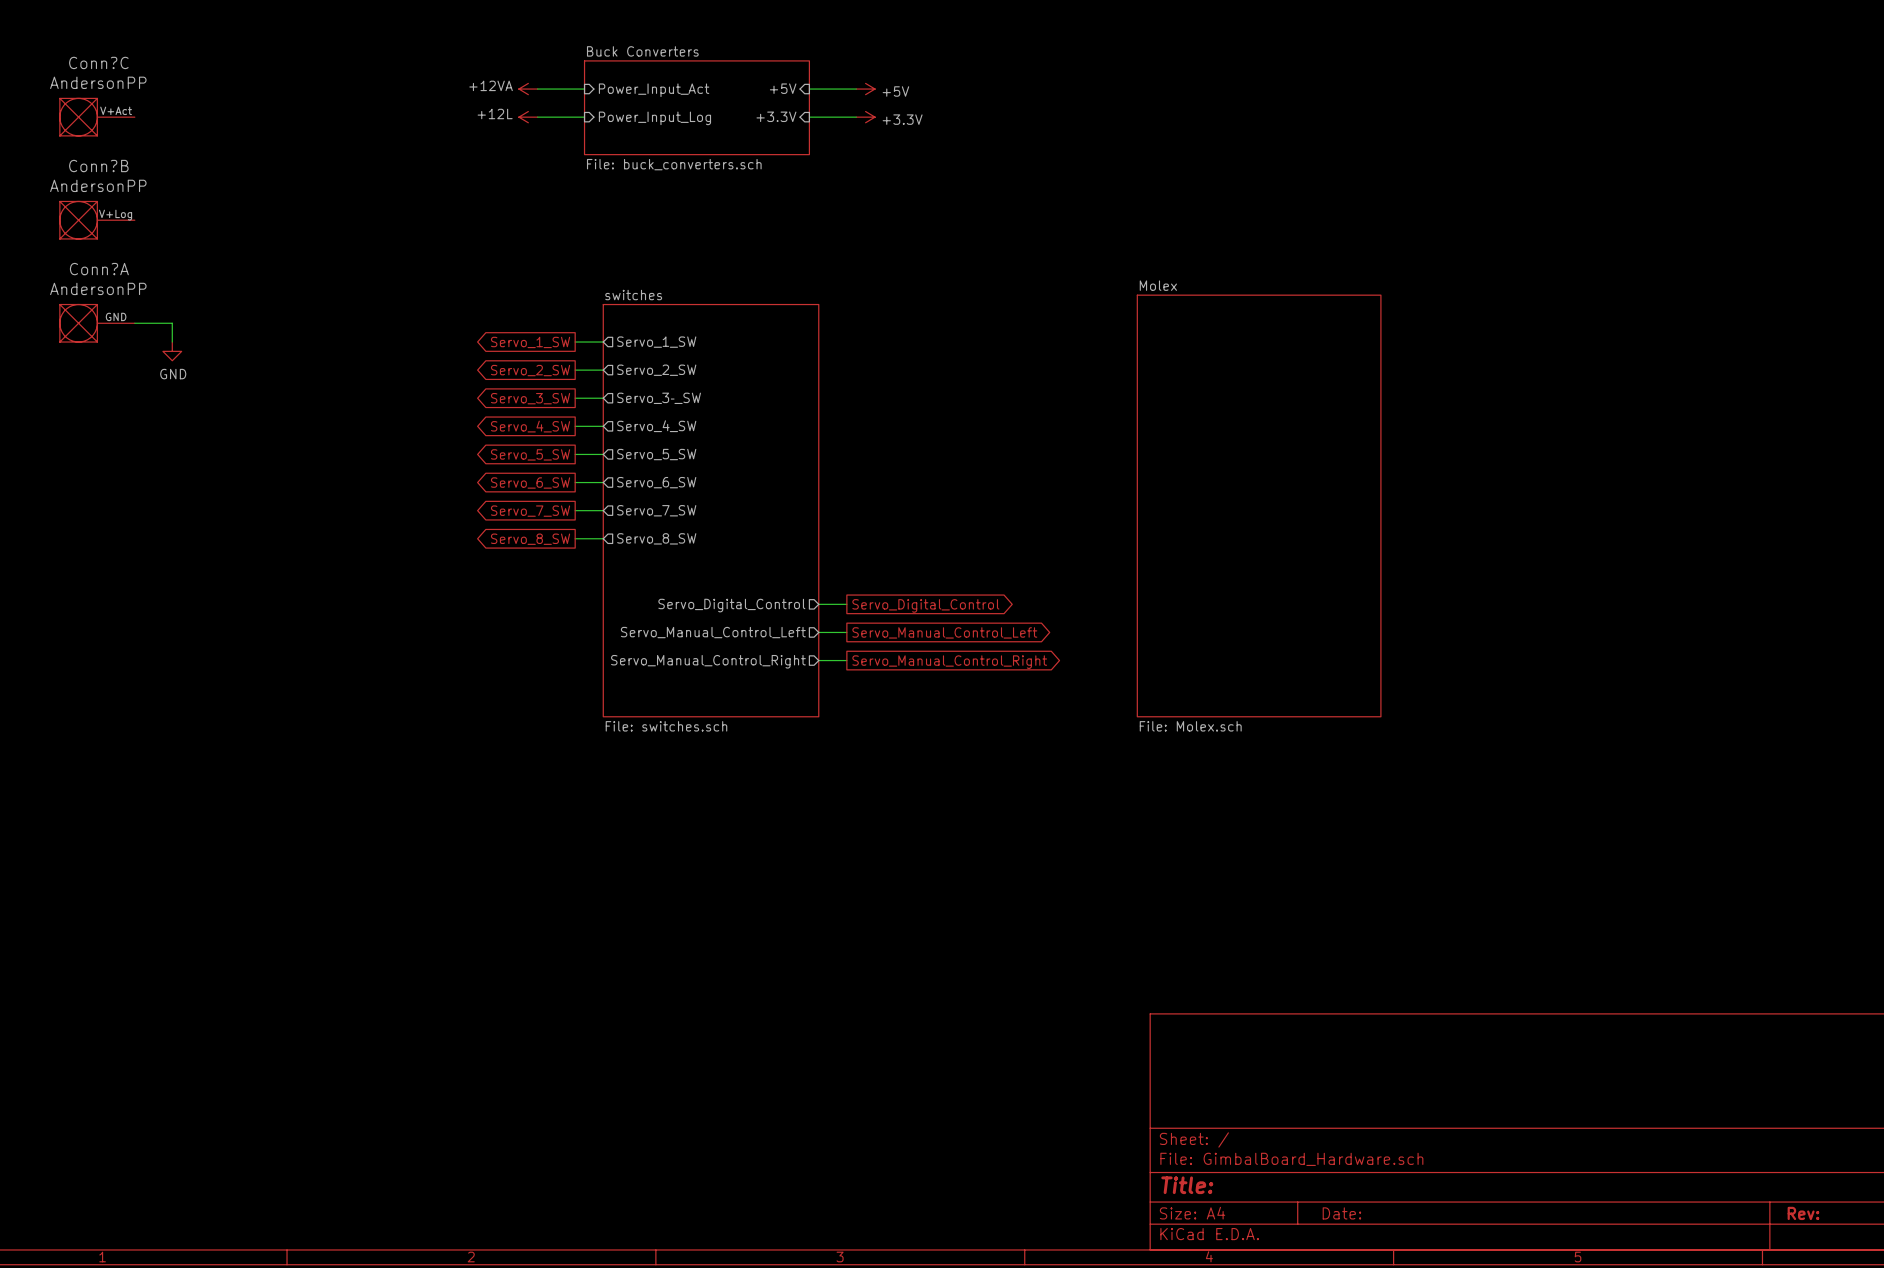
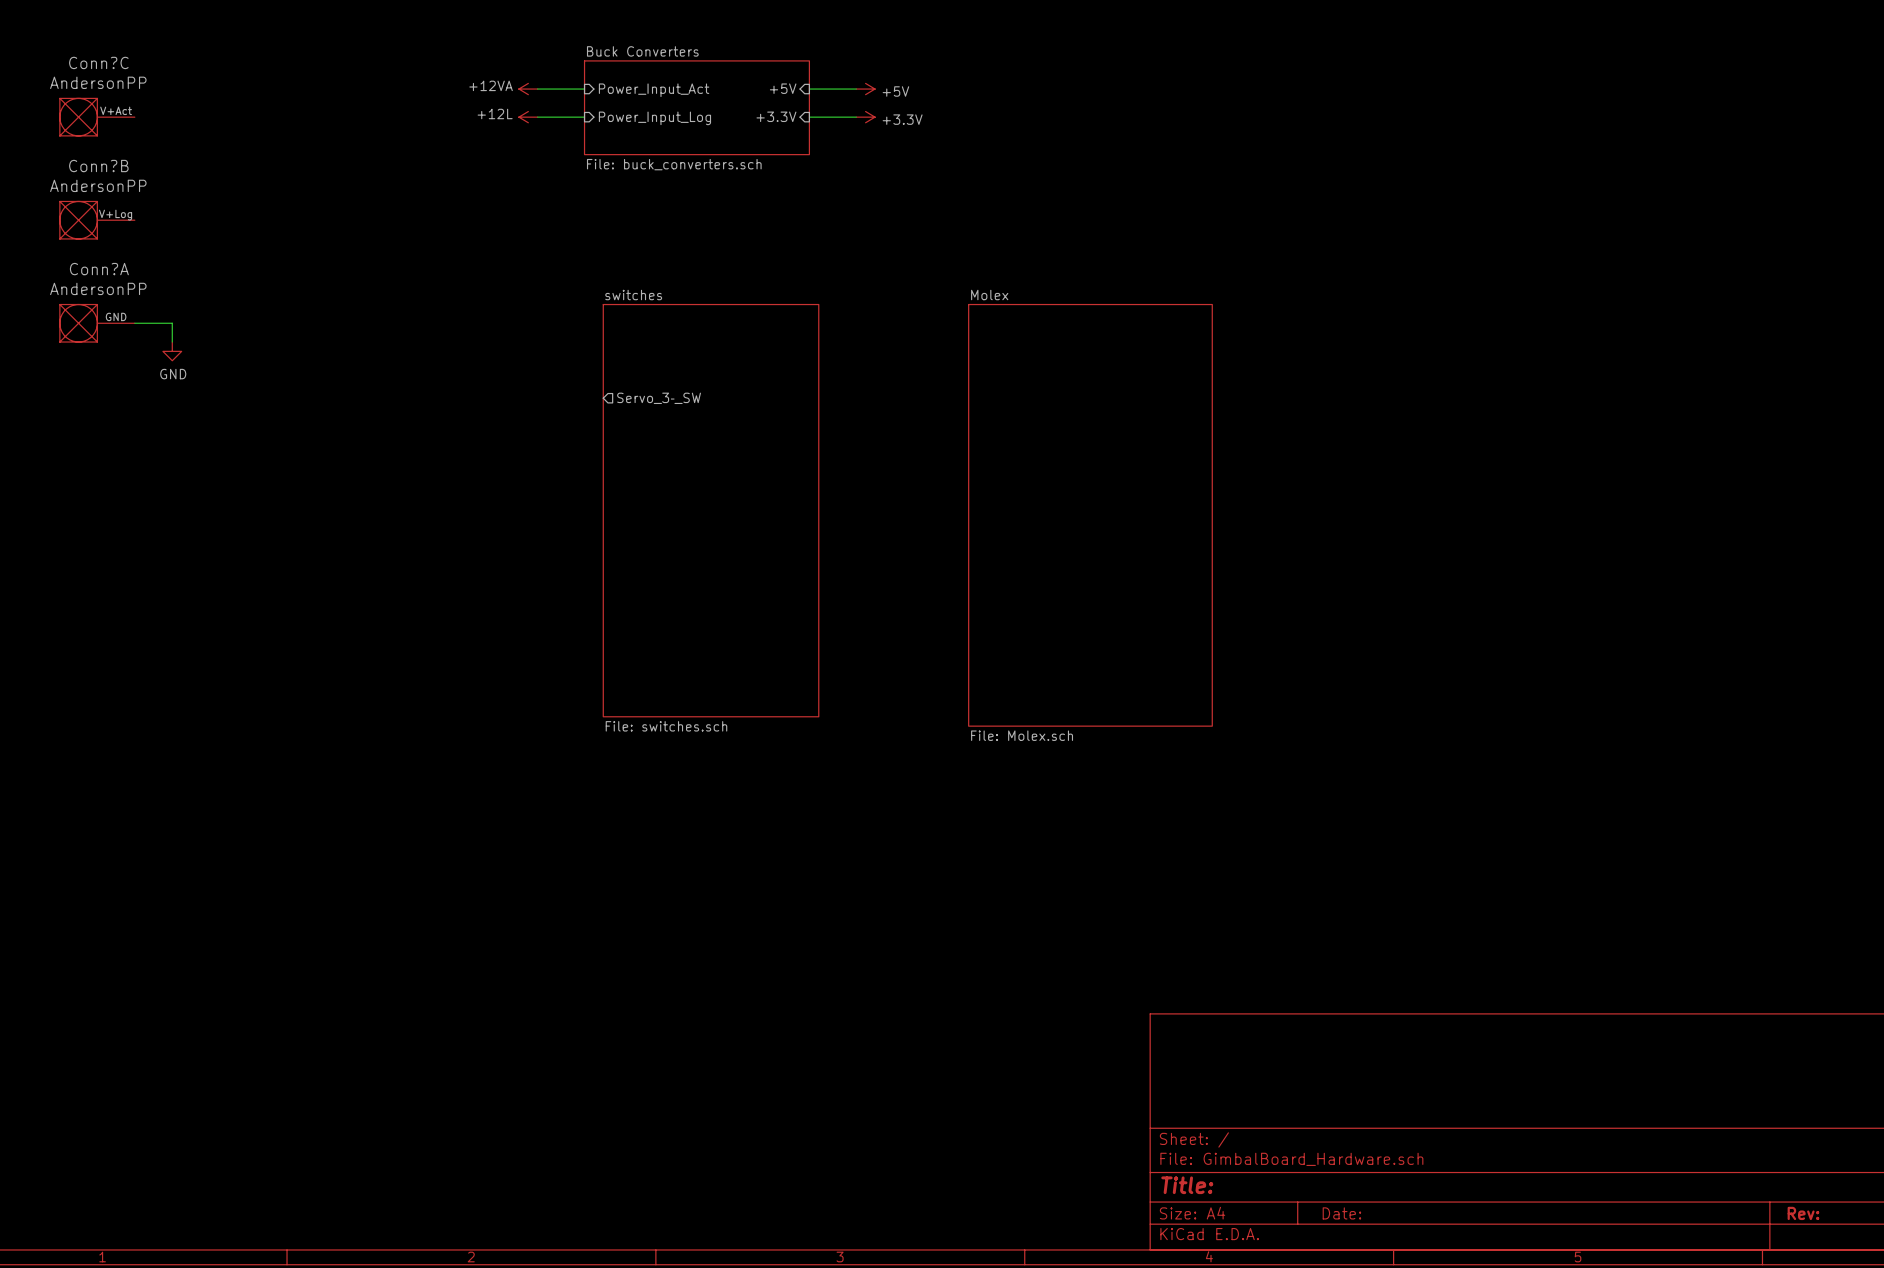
global label: Servo_1_SW (530, 342) -> none
wire: (575, 342) (603, 342) -> none
sheet pin: Servo_1_SW (656, 342) -> none
global label: Servo_2_SW (530, 370) -> none
wire: (575, 370) (603, 370) -> none
sheet pin: Servo_2_SW (656, 370) -> none
global label: Servo_3_SW (530, 398) -> none
wire: (575, 398) (603, 398) -> none
global label: Servo_4_SW (530, 426) -> none
wire: (575, 426) (603, 426) -> none
sheet pin: Servo_4_SW (656, 426) -> none
global label: Servo_5_SW (530, 454) -> none
wire: (575, 454) (603, 454) -> none
sheet pin: Servo_5_SW (656, 454) -> none
global label: Servo_6_SW (530, 482) -> none
wire: (575, 482) (603, 482) -> none
sheet pin: Servo_6_SW (656, 482) -> none
sheet Molex position: (1259, 505) -> (1090, 515)
wire: (575, 510) (603, 510) -> none
sheet pin: Servo_7_SW (656, 510) -> none
global label: Servo_7_SW (530, 511) -> none
wire: (575, 538) (603, 538) -> none
sheet pin: Servo_8_SW (656, 538) -> none
global label: Servo_8_SW (530, 539) -> none
wire: (818, 604) (846, 604) -> none
sheet pin: Servo_Digital_Control (731, 605) -> none
global label: Servo_Digital_Control (925, 605) -> none
sheet pin: Servo_Manual_Control_Left (713, 632) -> none
wire: (818, 632) (846, 632) -> none
global label: Servo_Manual_Control_Left (944, 632) -> none
wire: (818, 660) (846, 660) -> none
sheet pin: Servo_Manual_Control_Right (708, 661) -> none
global label: Servo_Manual_Control_Right (949, 662) -> none

